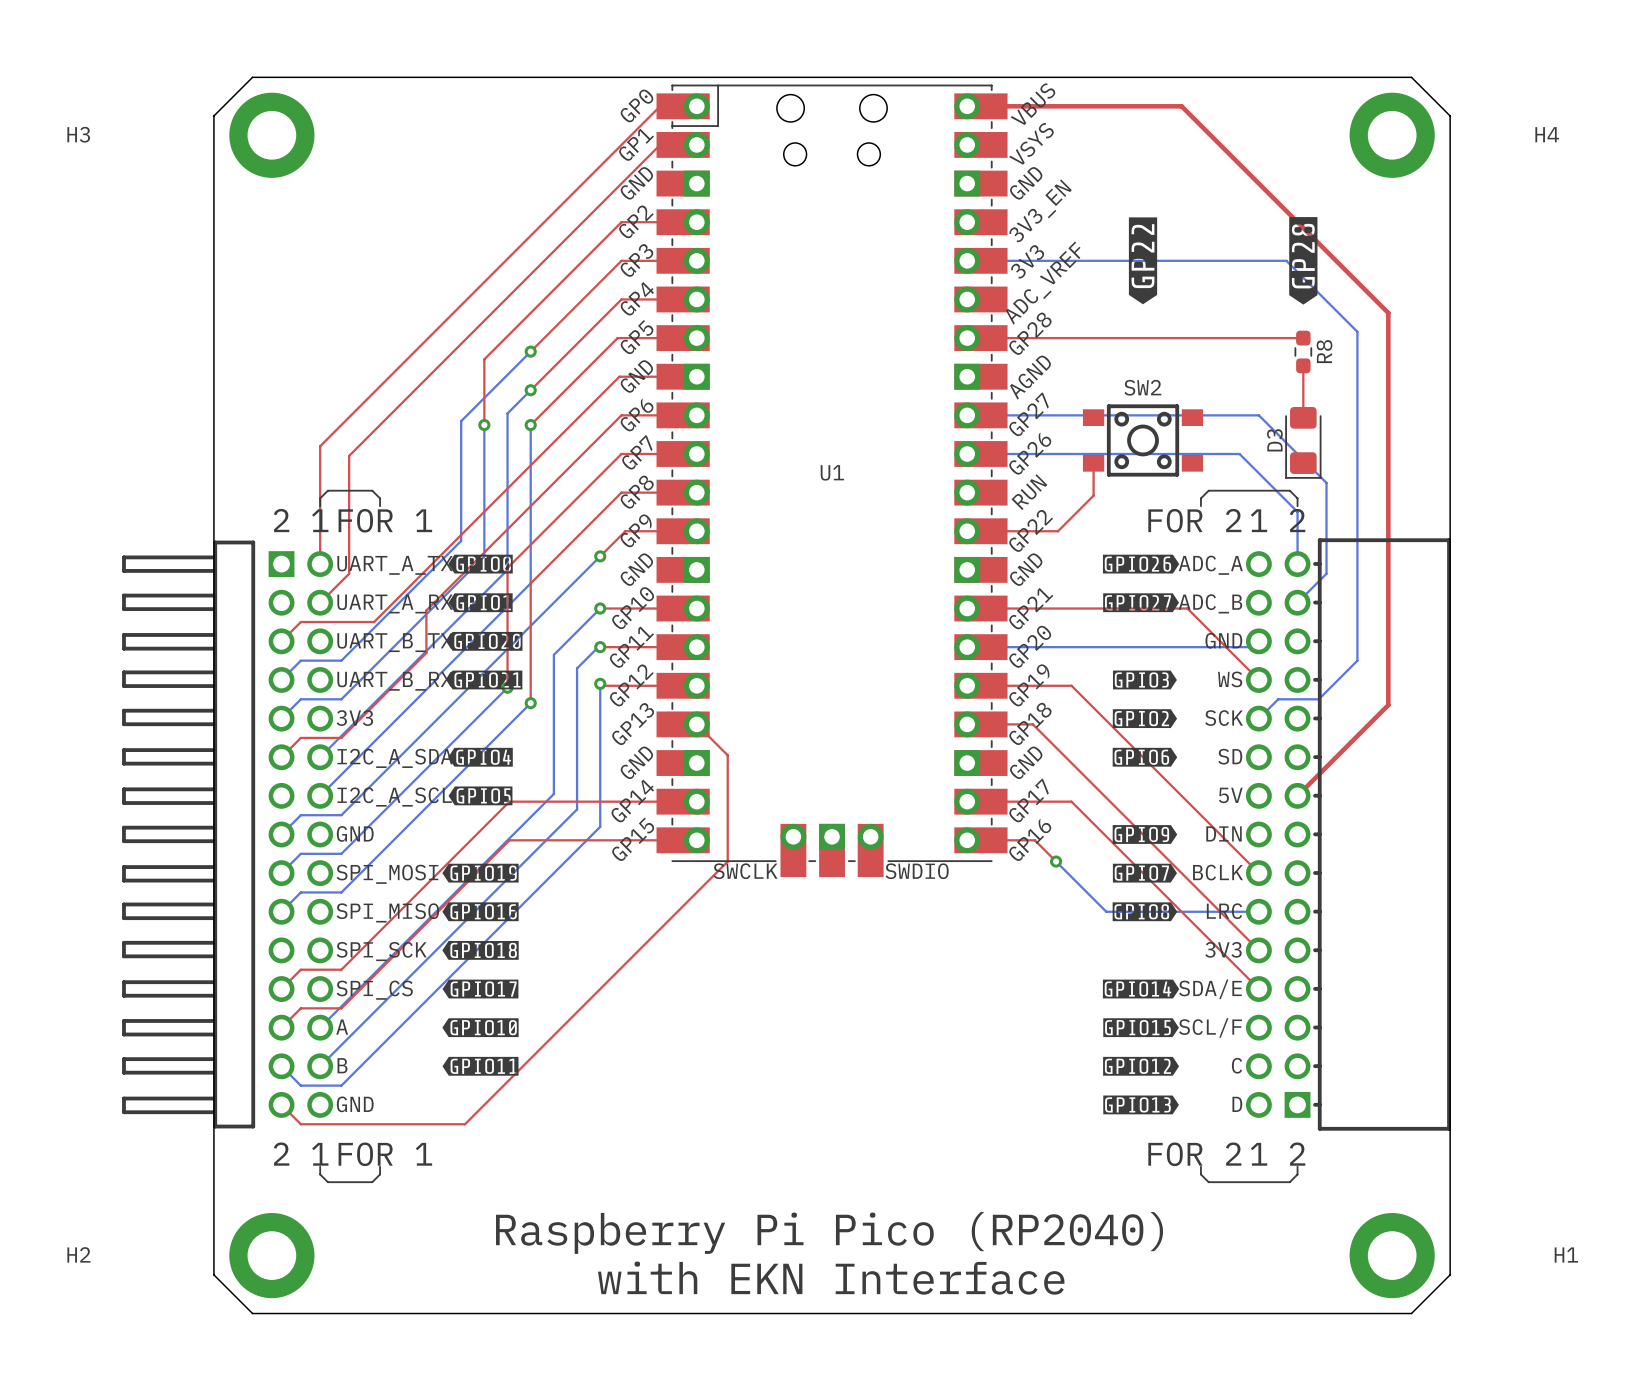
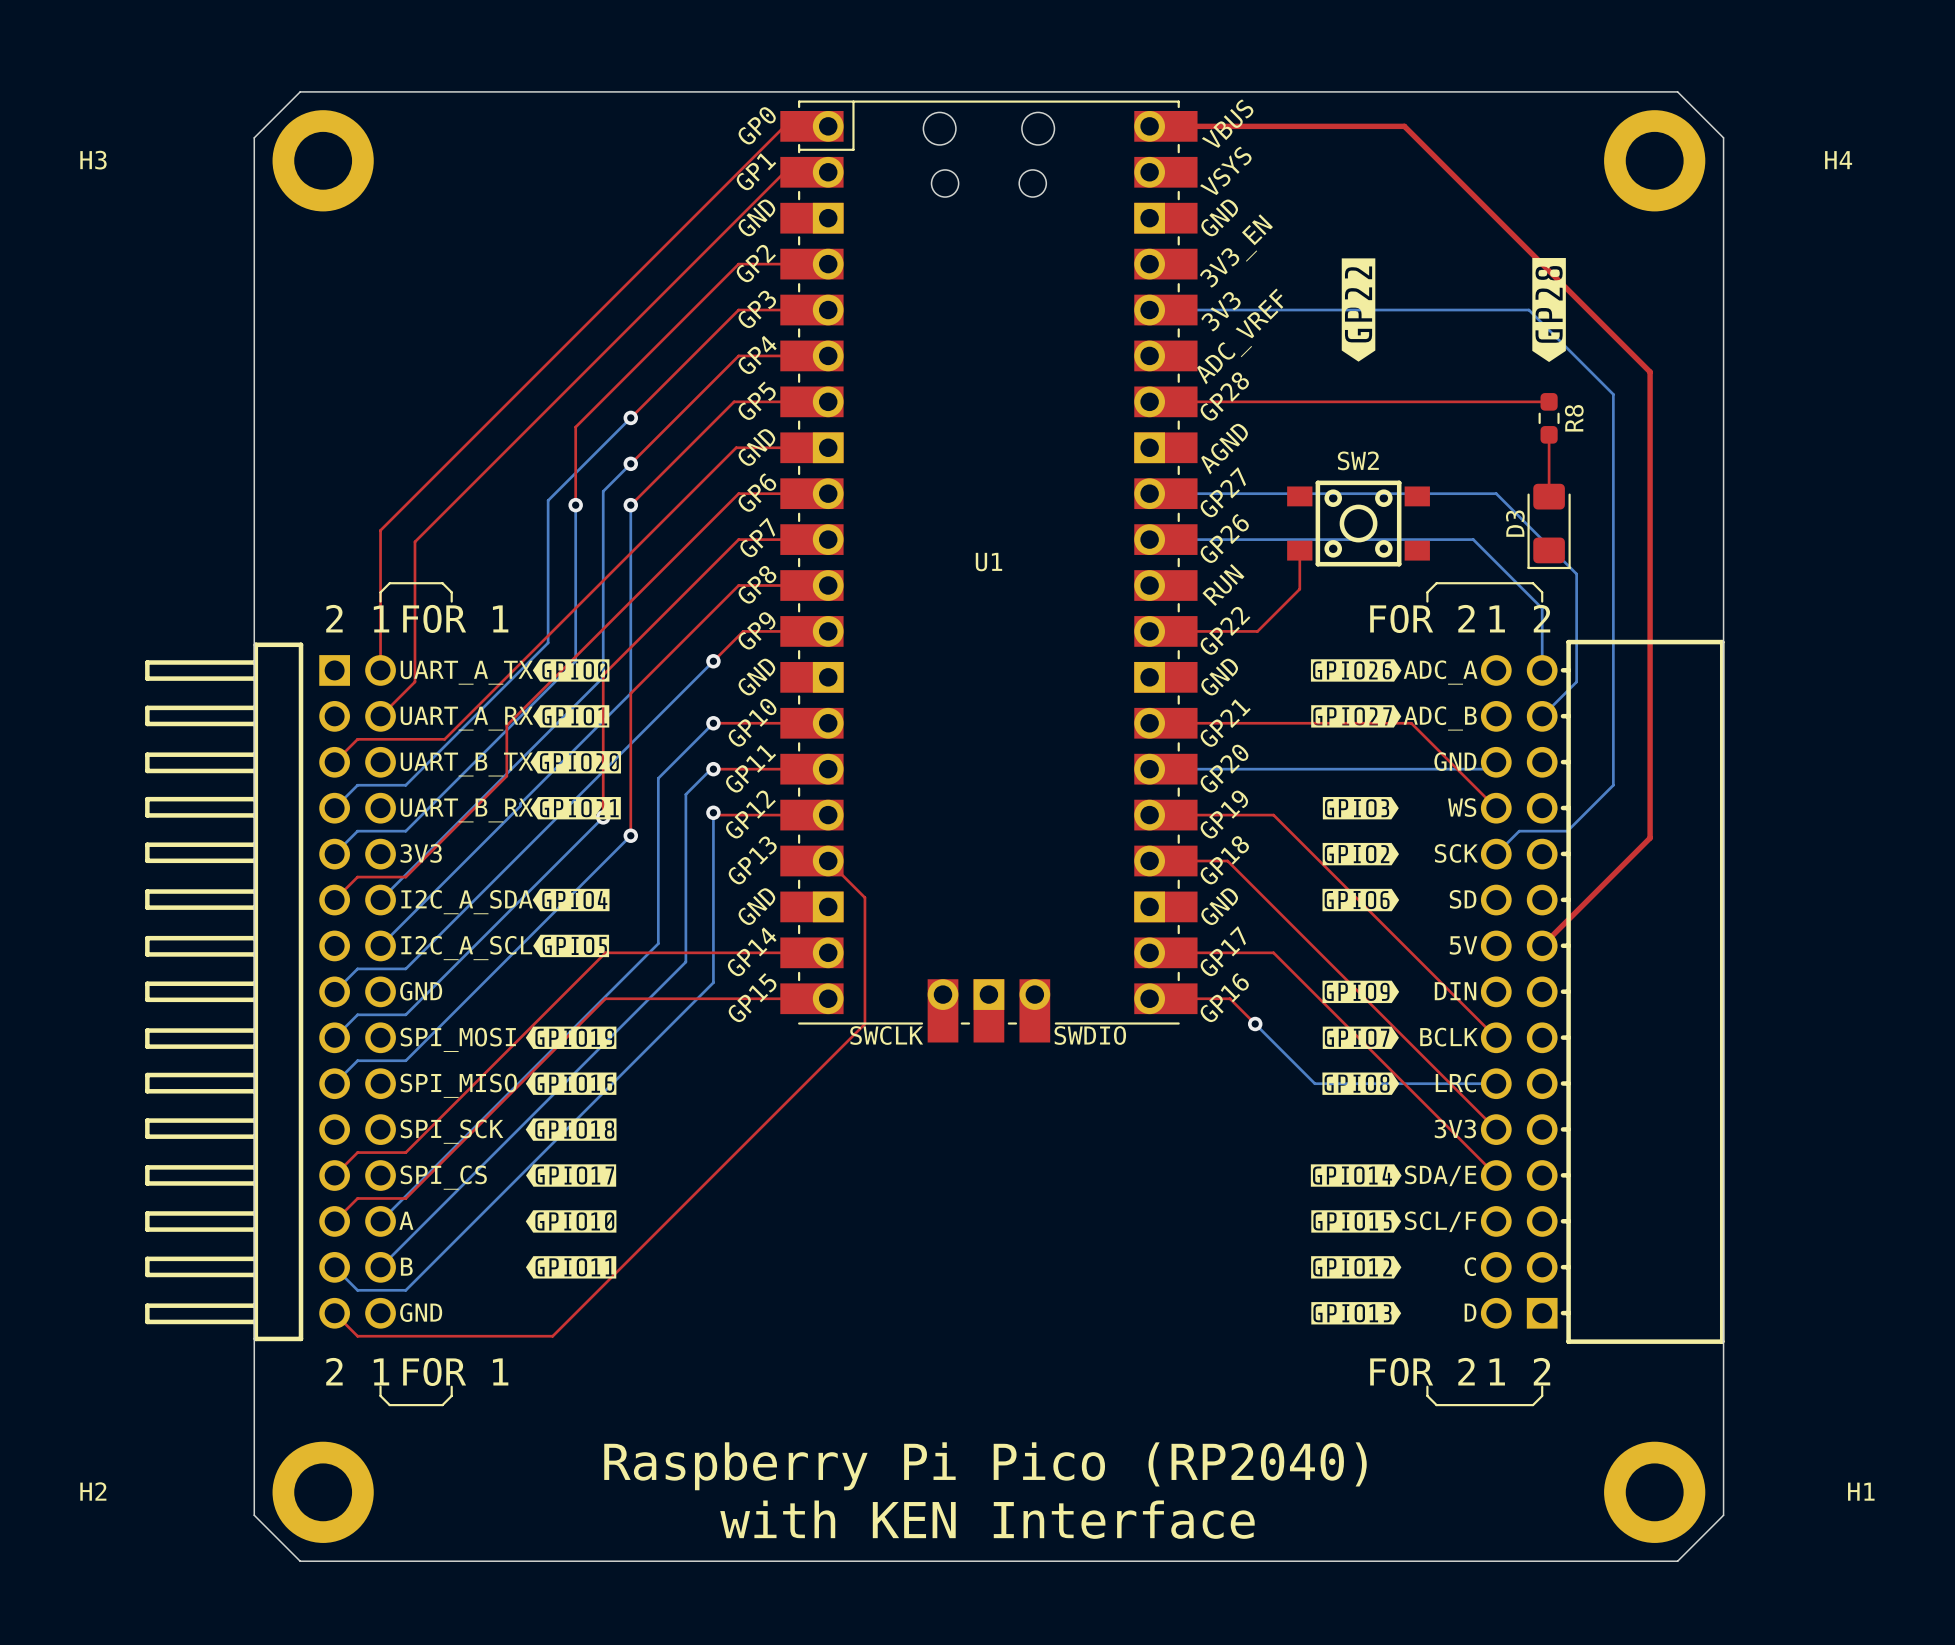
text: with EKN Interface (831, 1278) -> with KEN Interface (987, 1519)

